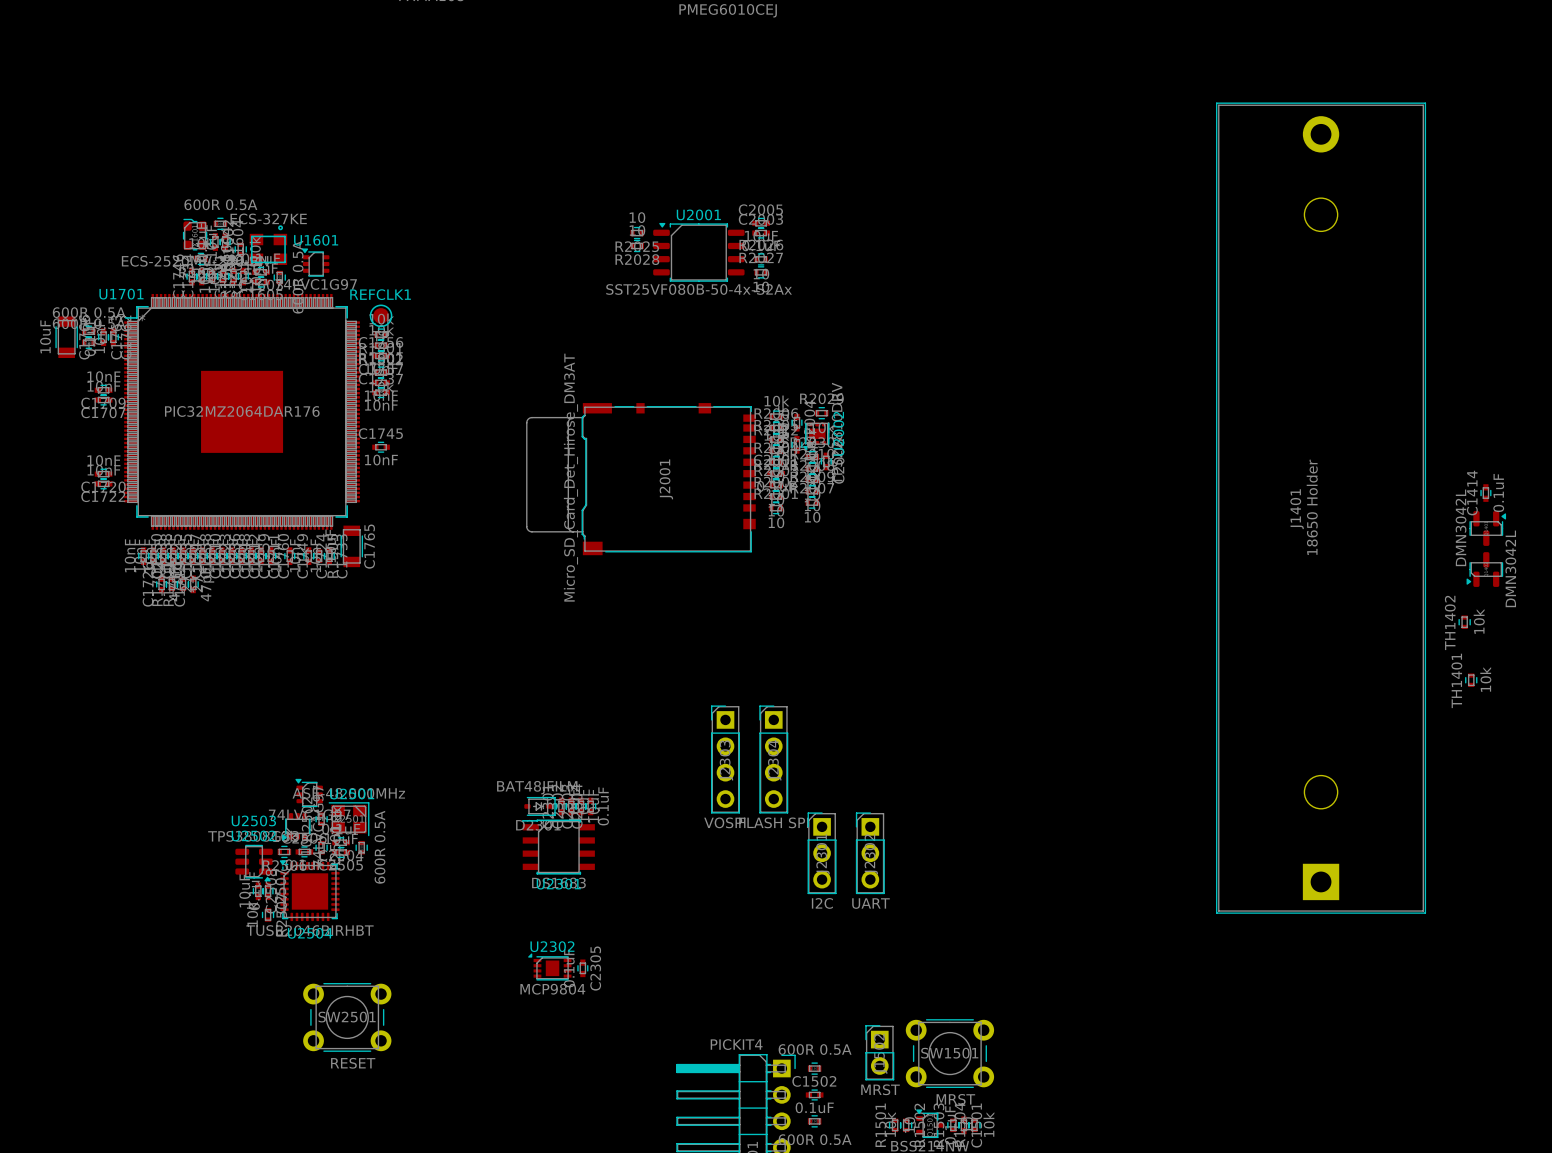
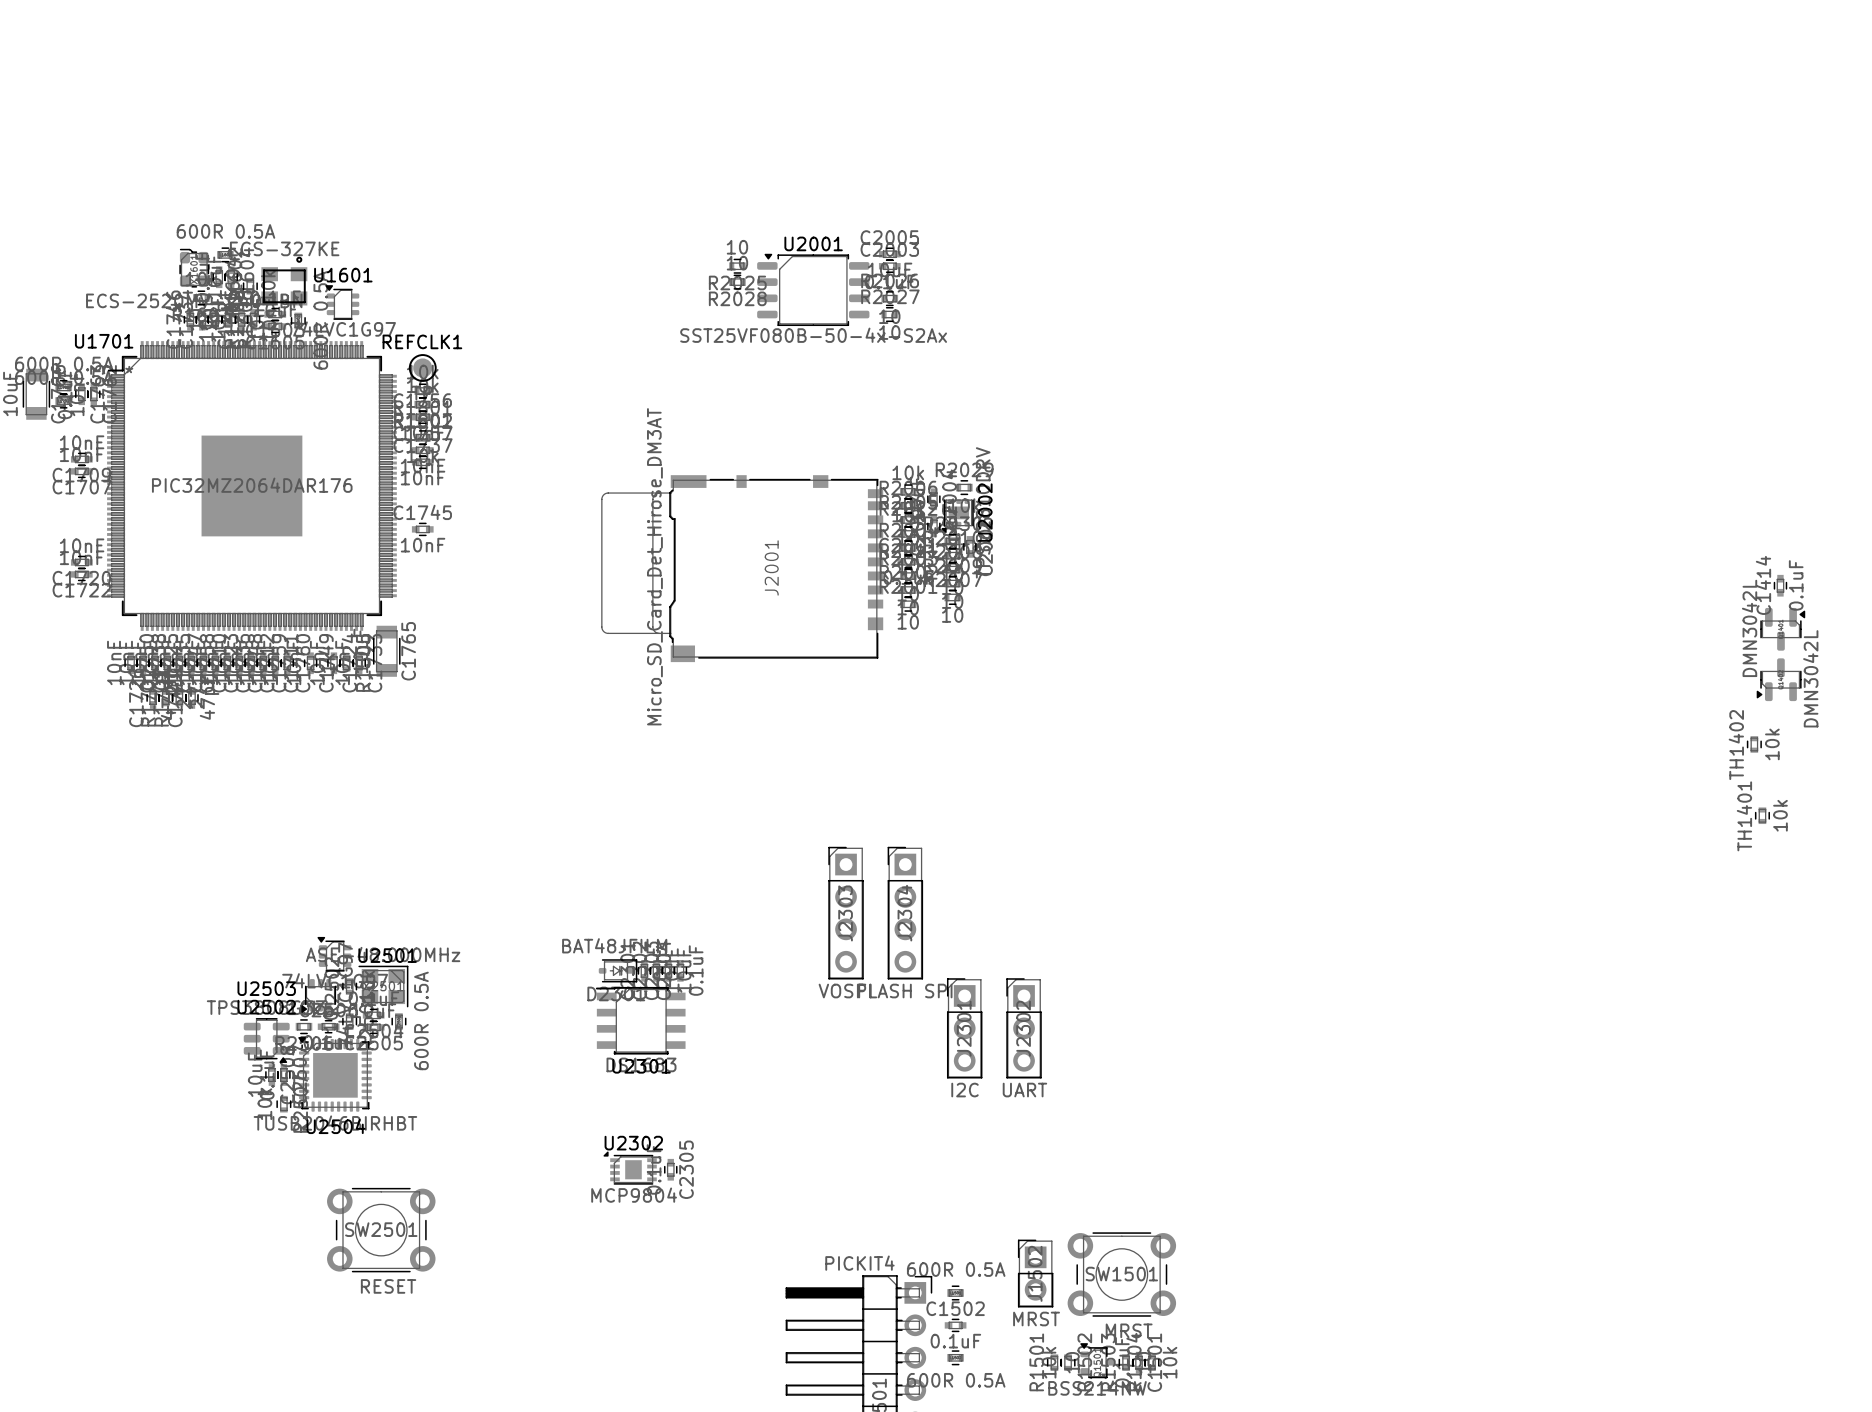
J1401: 18650 Holder (1321, 508) -> none

